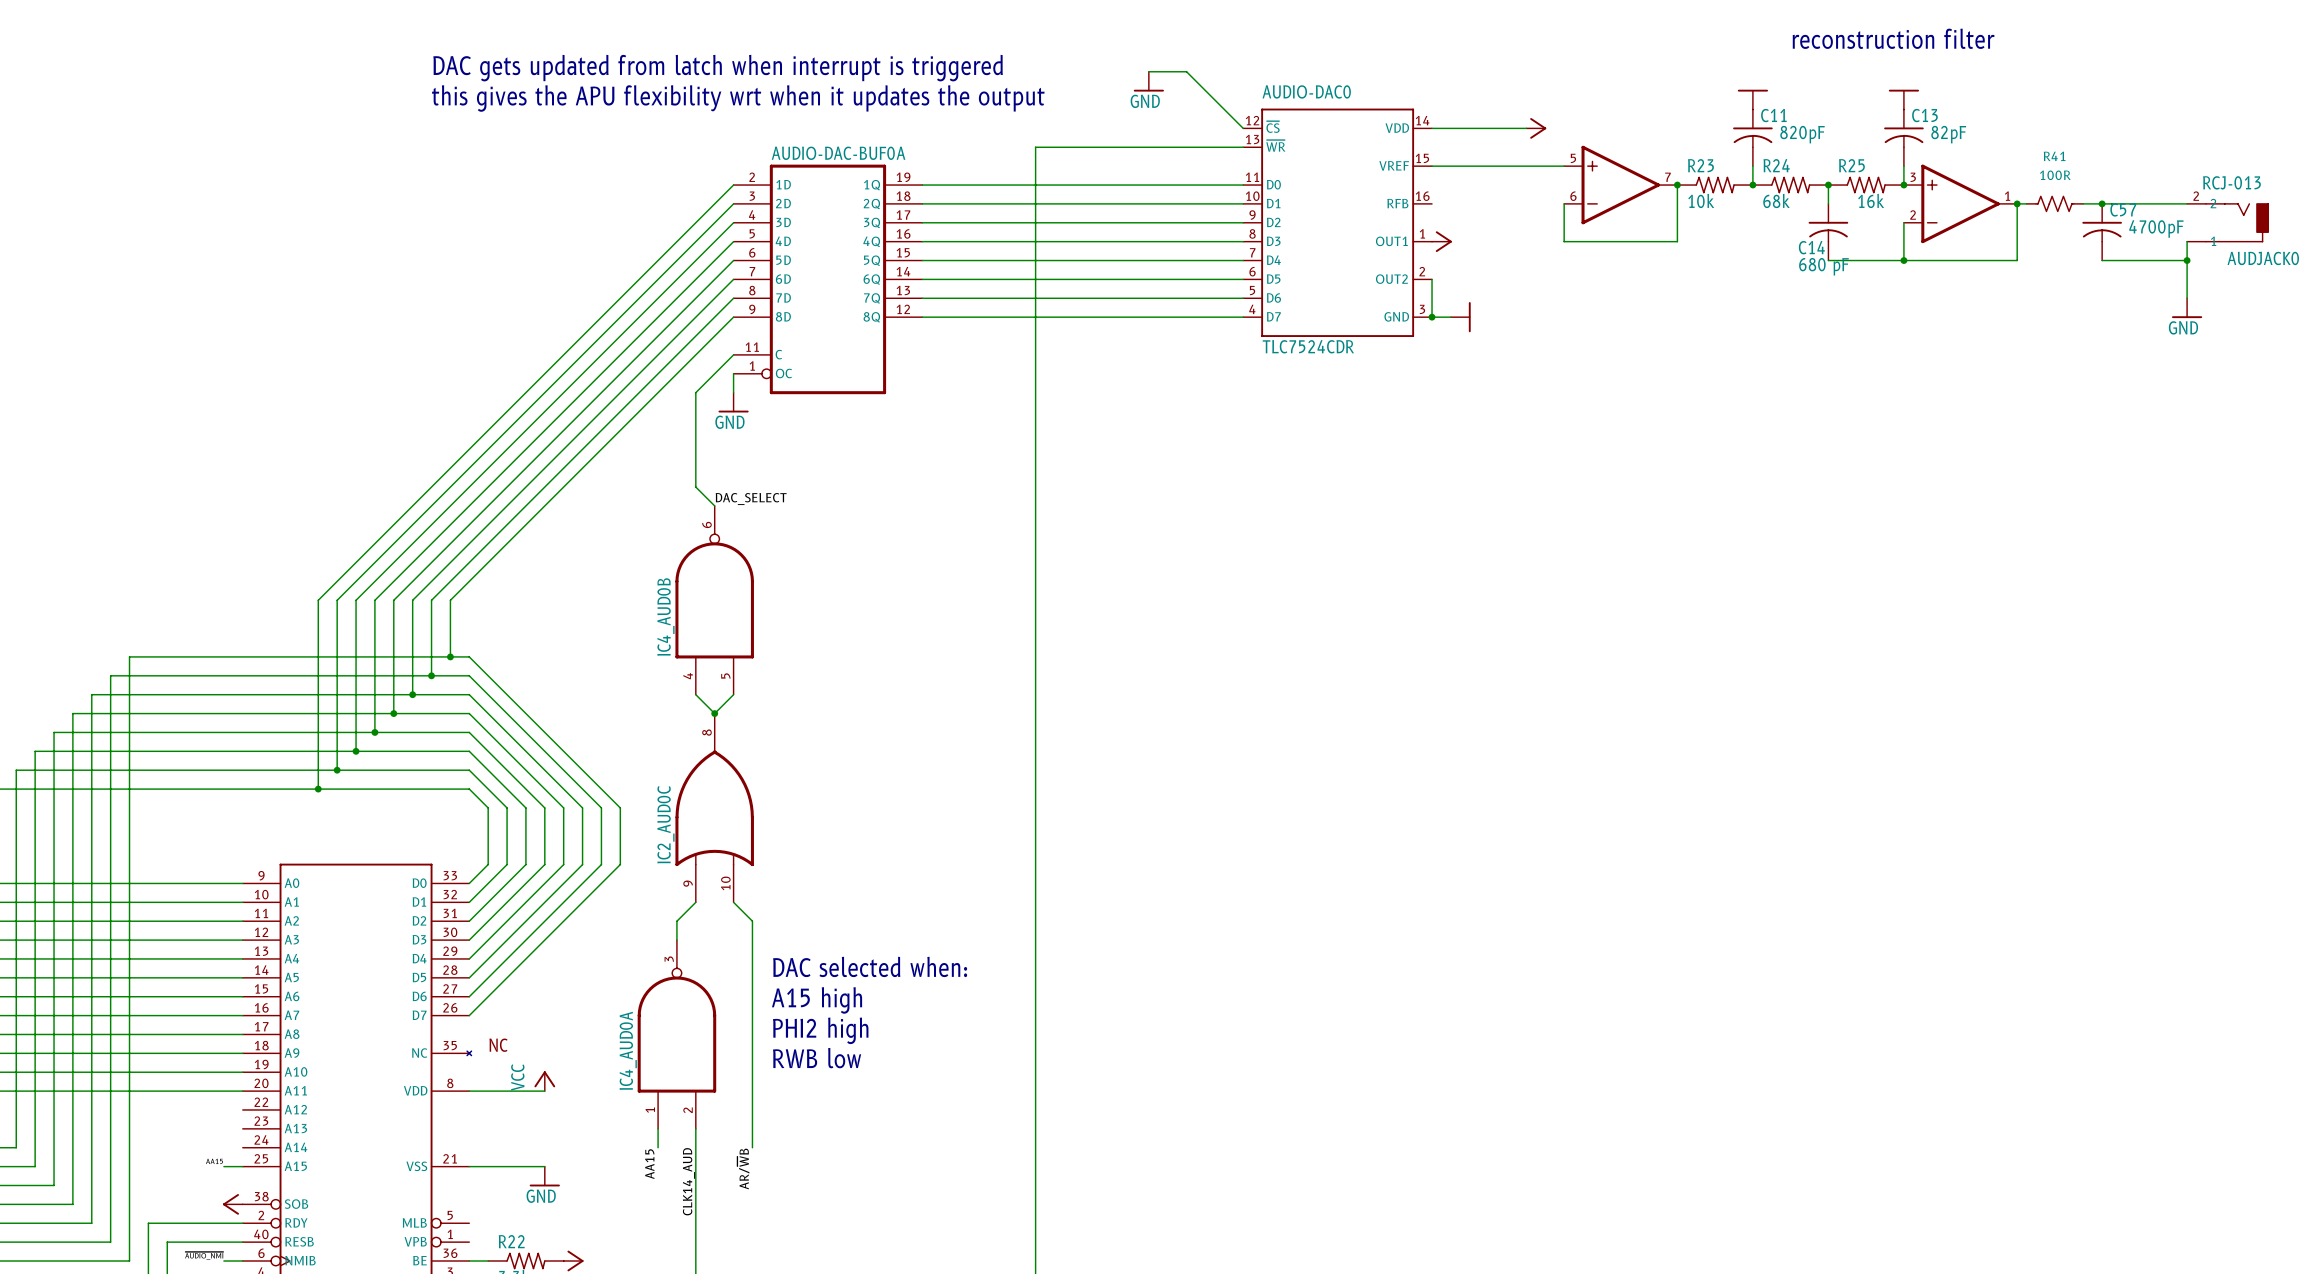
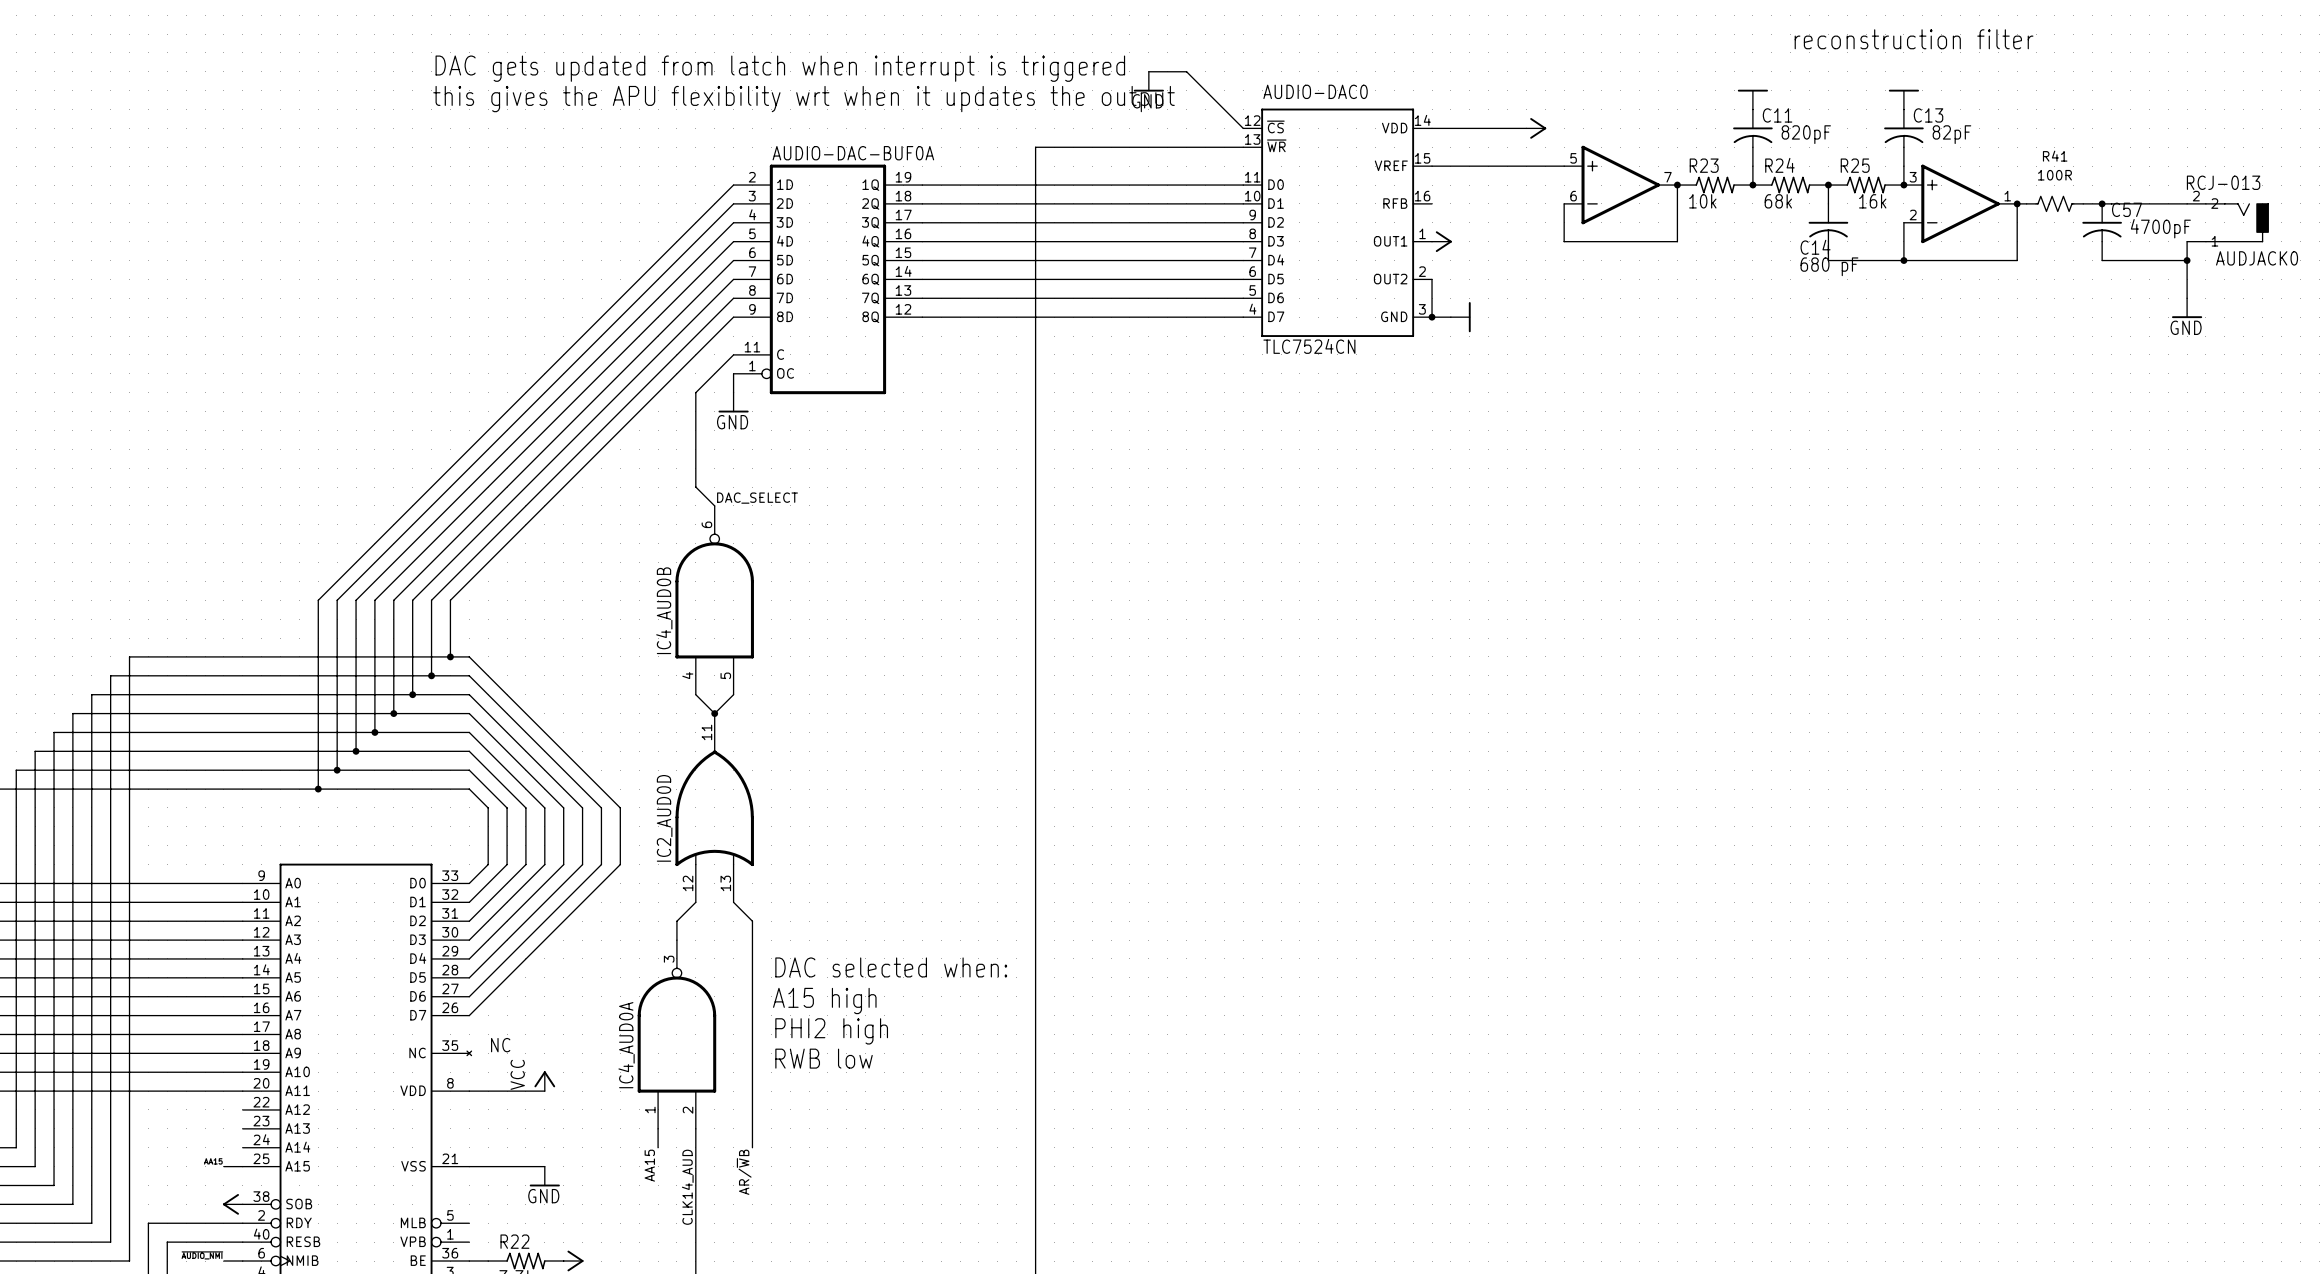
AUDIO-DAC0 value: TLC7524CDR (1308, 346) -> TLC7524CN (1309, 346)
IC2_AUD0C pin number: 8 (706, 732) -> 11 (706, 732)
IC2_AUD0C name: IC2_AUD0C (665, 824) -> IC2_AUD0D (664, 818)
IC2_AUD0C pin number: 9 (688, 883) -> 12 (688, 883)
IC2_AUD0C pin number: 10 (725, 883) -> 13 (725, 883)

